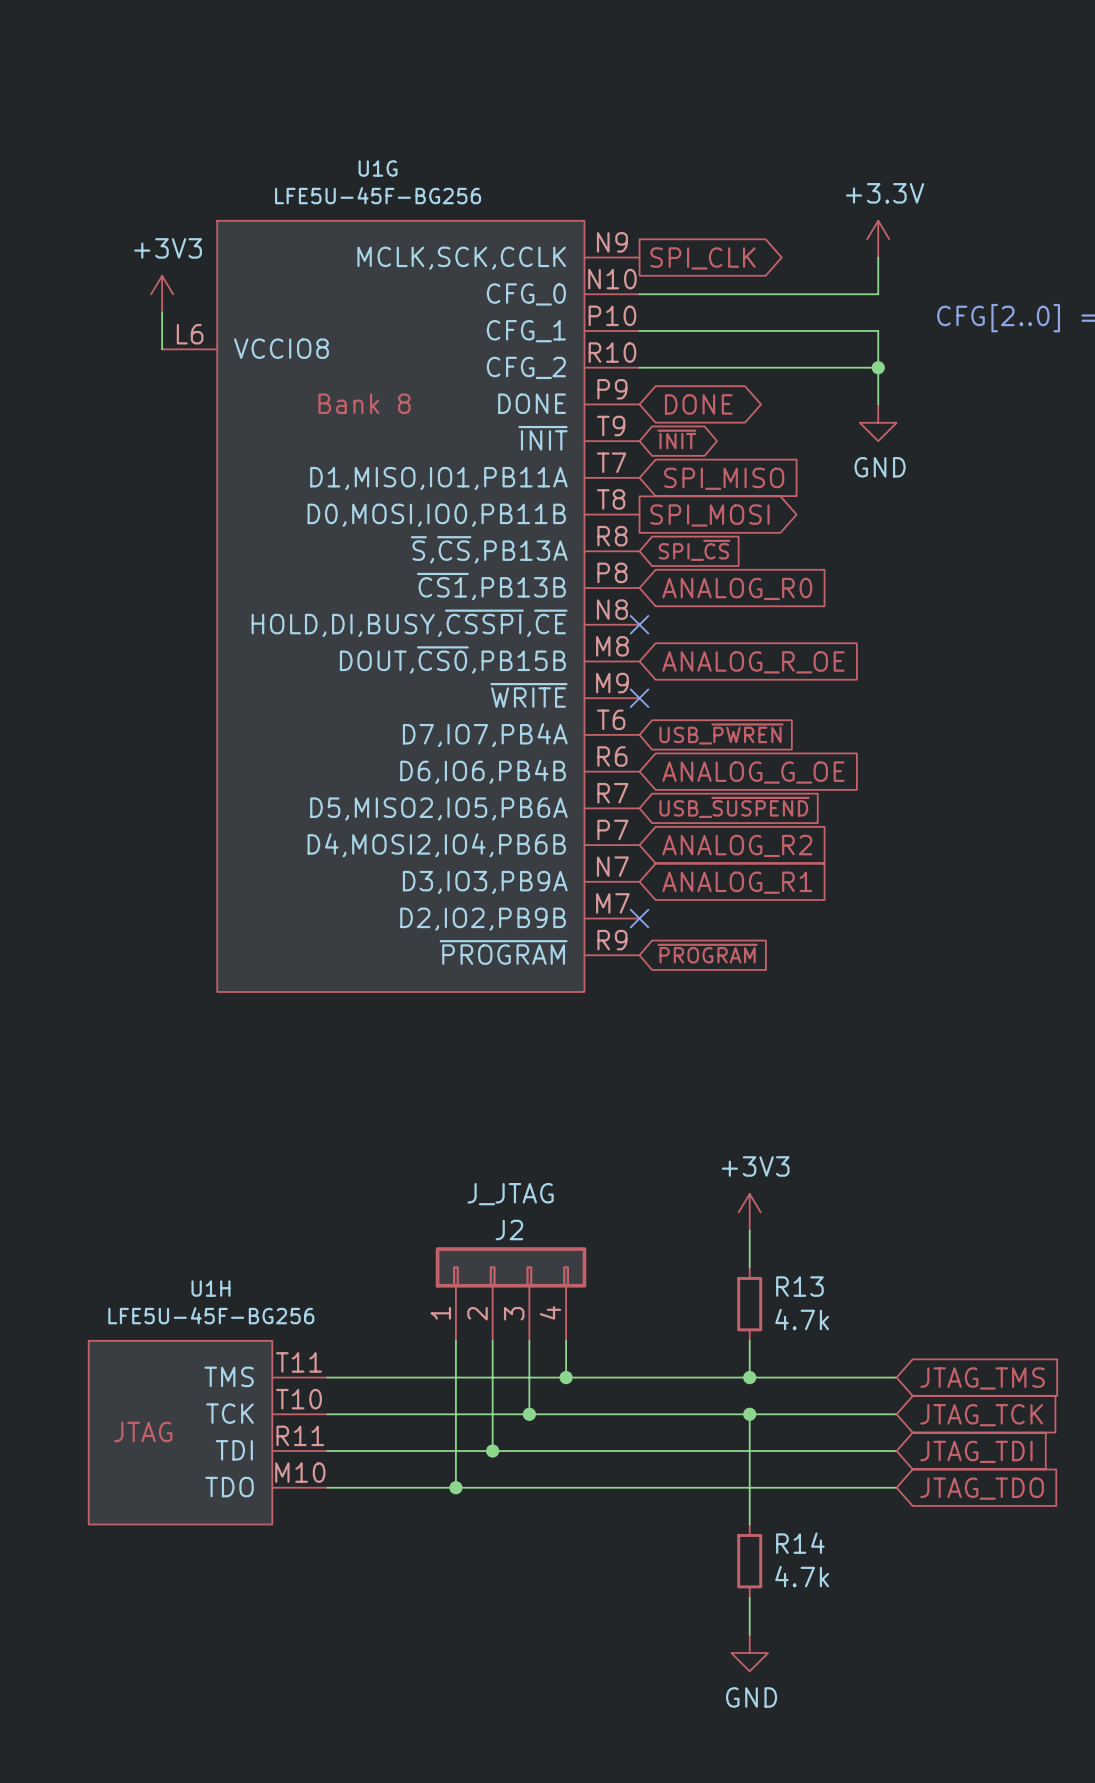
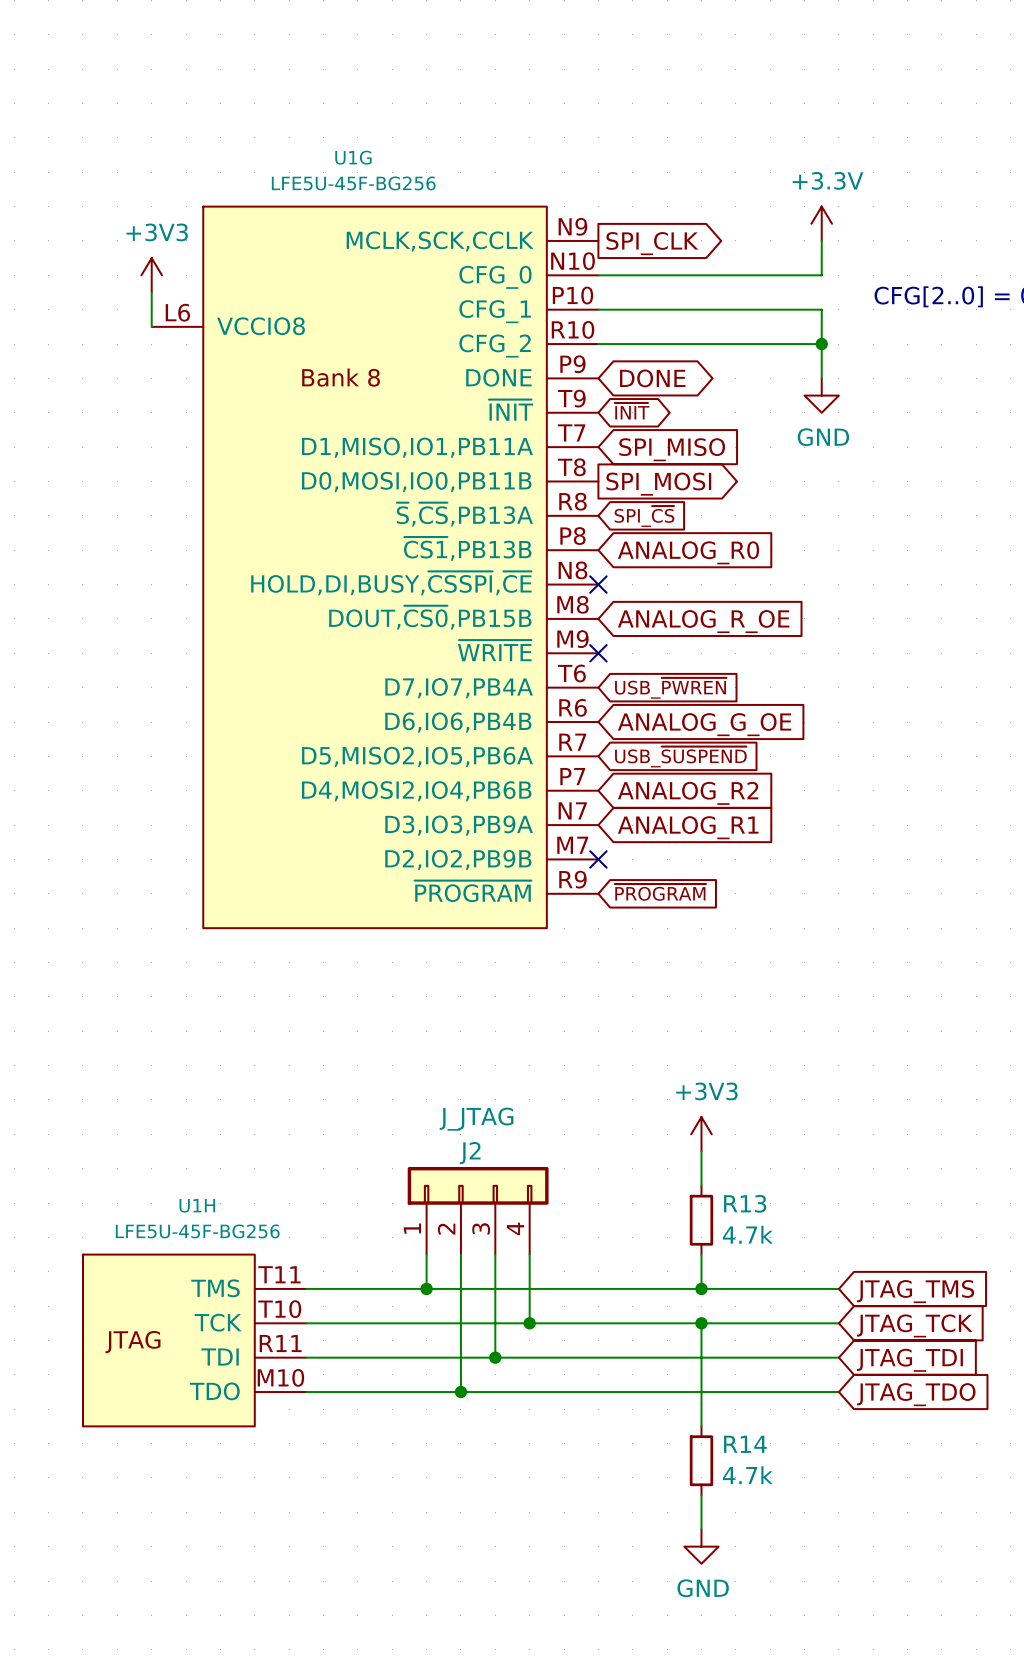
wire: (455, 1377) (455, 1487) -> none
junction: none -> (426, 1288)
wire: none -> (529, 1288) (529, 1323)
junction: (566, 1377) -> none
wire: none -> (495, 1323) (495, 1357)
junction: (529, 1414) -> none
junction: none -> (529, 1323)
wire: none -> (460, 1357) (460, 1392)
junction: (492, 1451) -> none
junction: none -> (495, 1357)
junction: (455, 1487) -> none
junction: none -> (460, 1392)

